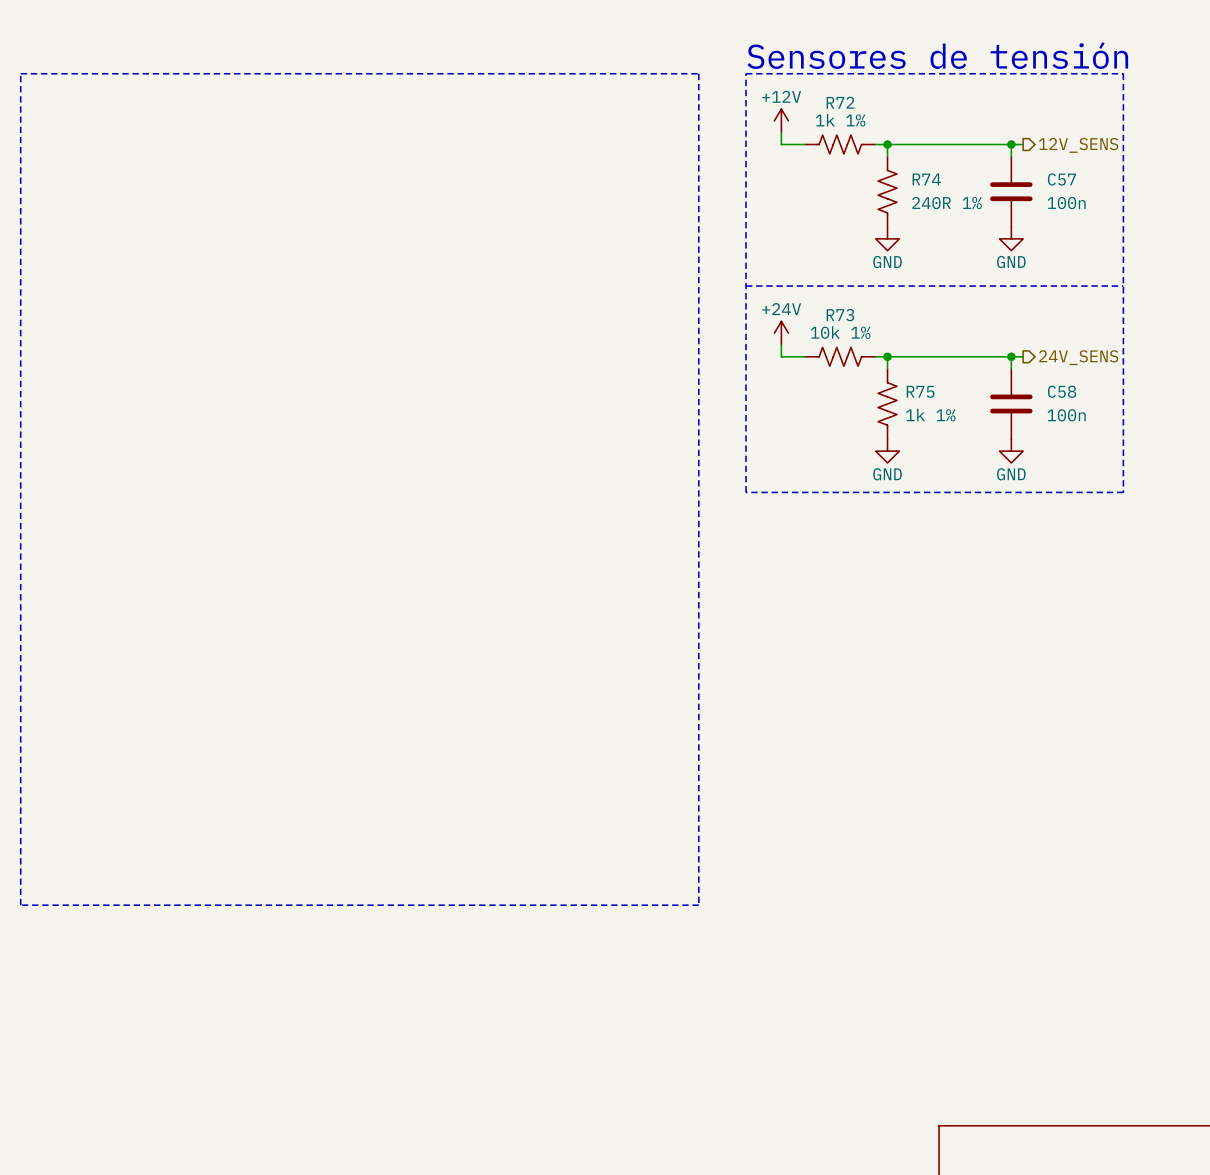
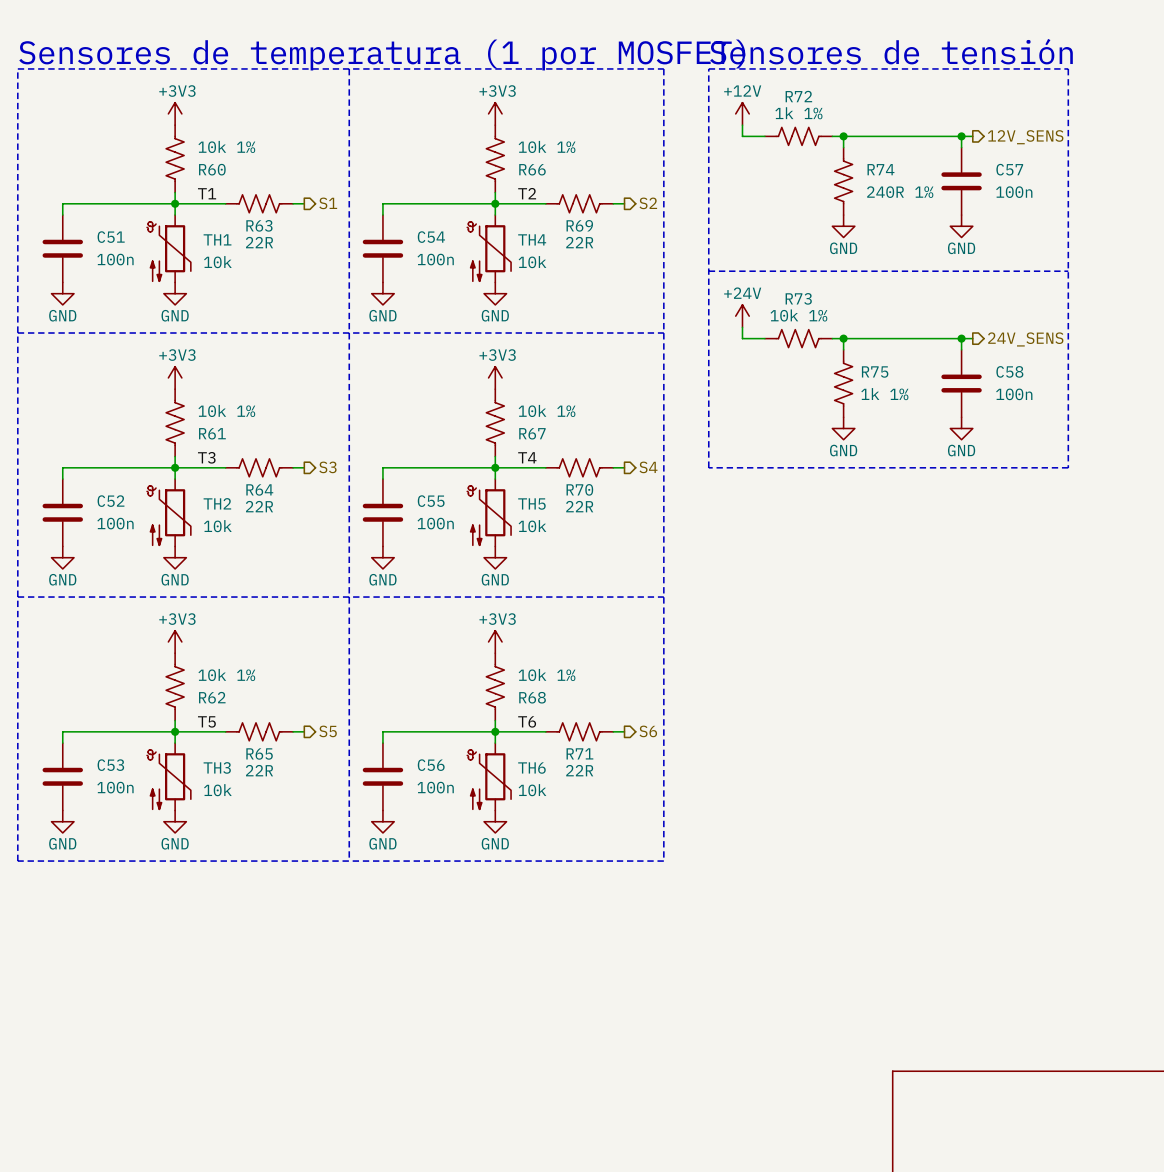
text: none -> Sensores de temperatura (1 por MOSFET) (382, 55)
line: none -> (349, 68) (349, 861)
power symbol: none -> +3V3 (175, 113)
power symbol: none -> +3V3 (495, 113)
R60: none -> 10k 1% (175, 158)
R66: none -> 10k 1% (495, 158)
wire: none -> (175, 192) (175, 215)
wire: none -> (495, 192) (495, 215)
label: none -> T1 (207, 193)
label: none -> T2 (527, 193)
hierarchical label: none -> S1 (328, 203)
hierarchical label: none -> S2 (648, 203)
junction: none -> (175, 203)
wire: none -> (225, 203) (62, 203) (62, 215)
R63: none -> 22R (259, 203)
wire: none -> (293, 203) (304, 203)
junction: none -> (495, 203)
wire: none -> (545, 203) (382, 203) (382, 215)
R69: none -> 22R (579, 203)
wire: none -> (613, 203) (624, 203)
C51: none -> 100n (62, 248)
TH1: none -> 10k (168, 248)
C54: none -> 100n (382, 248)
TH4: none -> 10k (489, 248)
power symbol: none -> GND (62, 293)
power symbol: none -> GND (175, 293)
power symbol: none -> GND (382, 293)
power symbol: none -> GND (495, 293)
line: none -> (17, 333) (663, 333)
power symbol: none -> +3V3 (175, 377)
power symbol: none -> +3V3 (495, 377)
R61: none -> 10k 1% (175, 422)
R67: none -> 10k 1% (495, 422)
wire: none -> (175, 456) (175, 479)
wire: none -> (495, 456) (495, 479)
label: none -> T3 (206, 457)
label: none -> T4 (527, 457)
hierarchical label: none -> S3 (327, 467)
hierarchical label: none -> S4 (648, 467)
junction: none -> (175, 467)
wire: none -> (225, 467) (62, 467) (62, 479)
R64: none -> 22R (259, 467)
wire: none -> (293, 467) (304, 467)
junction: none -> (495, 467)
wire: none -> (545, 467) (382, 467) (382, 479)
R70: none -> 22R (579, 467)
wire: none -> (613, 467) (624, 467)
C52: none -> 100n (62, 512)
TH2: none -> 10k (168, 512)
C55: none -> 100n (382, 512)
TH5: none -> 10k (489, 512)
power symbol: none -> GND (62, 557)
power symbol: none -> GND (175, 557)
power symbol: none -> GND (382, 557)
power symbol: none -> GND (495, 557)
line: none -> (17, 597) (663, 597)
power symbol: none -> +3V3 (175, 641)
power symbol: none -> +3V3 (495, 641)
R62: none -> 10k 1% (175, 686)
R68: none -> 10k 1% (495, 686)
wire: none -> (175, 720) (175, 743)
wire: none -> (495, 720) (495, 743)
label: none -> T5 (206, 721)
label: none -> T6 (527, 721)
junction: none -> (175, 731)
wire: none -> (225, 731) (62, 731) (62, 743)
R65: none -> 22R (259, 731)
wire: none -> (293, 731) (304, 731)
hierarchical label: none -> S5 (328, 731)
junction: none -> (495, 731)
wire: none -> (545, 731) (382, 731) (382, 743)
R71: none -> 22R (579, 731)
wire: none -> (613, 731) (624, 731)
hierarchical label: none -> S6 (648, 731)
C53: none -> 100n (62, 776)
TH3: none -> 10k (168, 776)
C56: none -> 100n (382, 776)
TH6: none -> 10k (489, 776)
power symbol: none -> GND (62, 821)
power symbol: none -> GND (175, 821)
power symbol: none -> GND (382, 821)
power symbol: none -> GND (495, 821)

